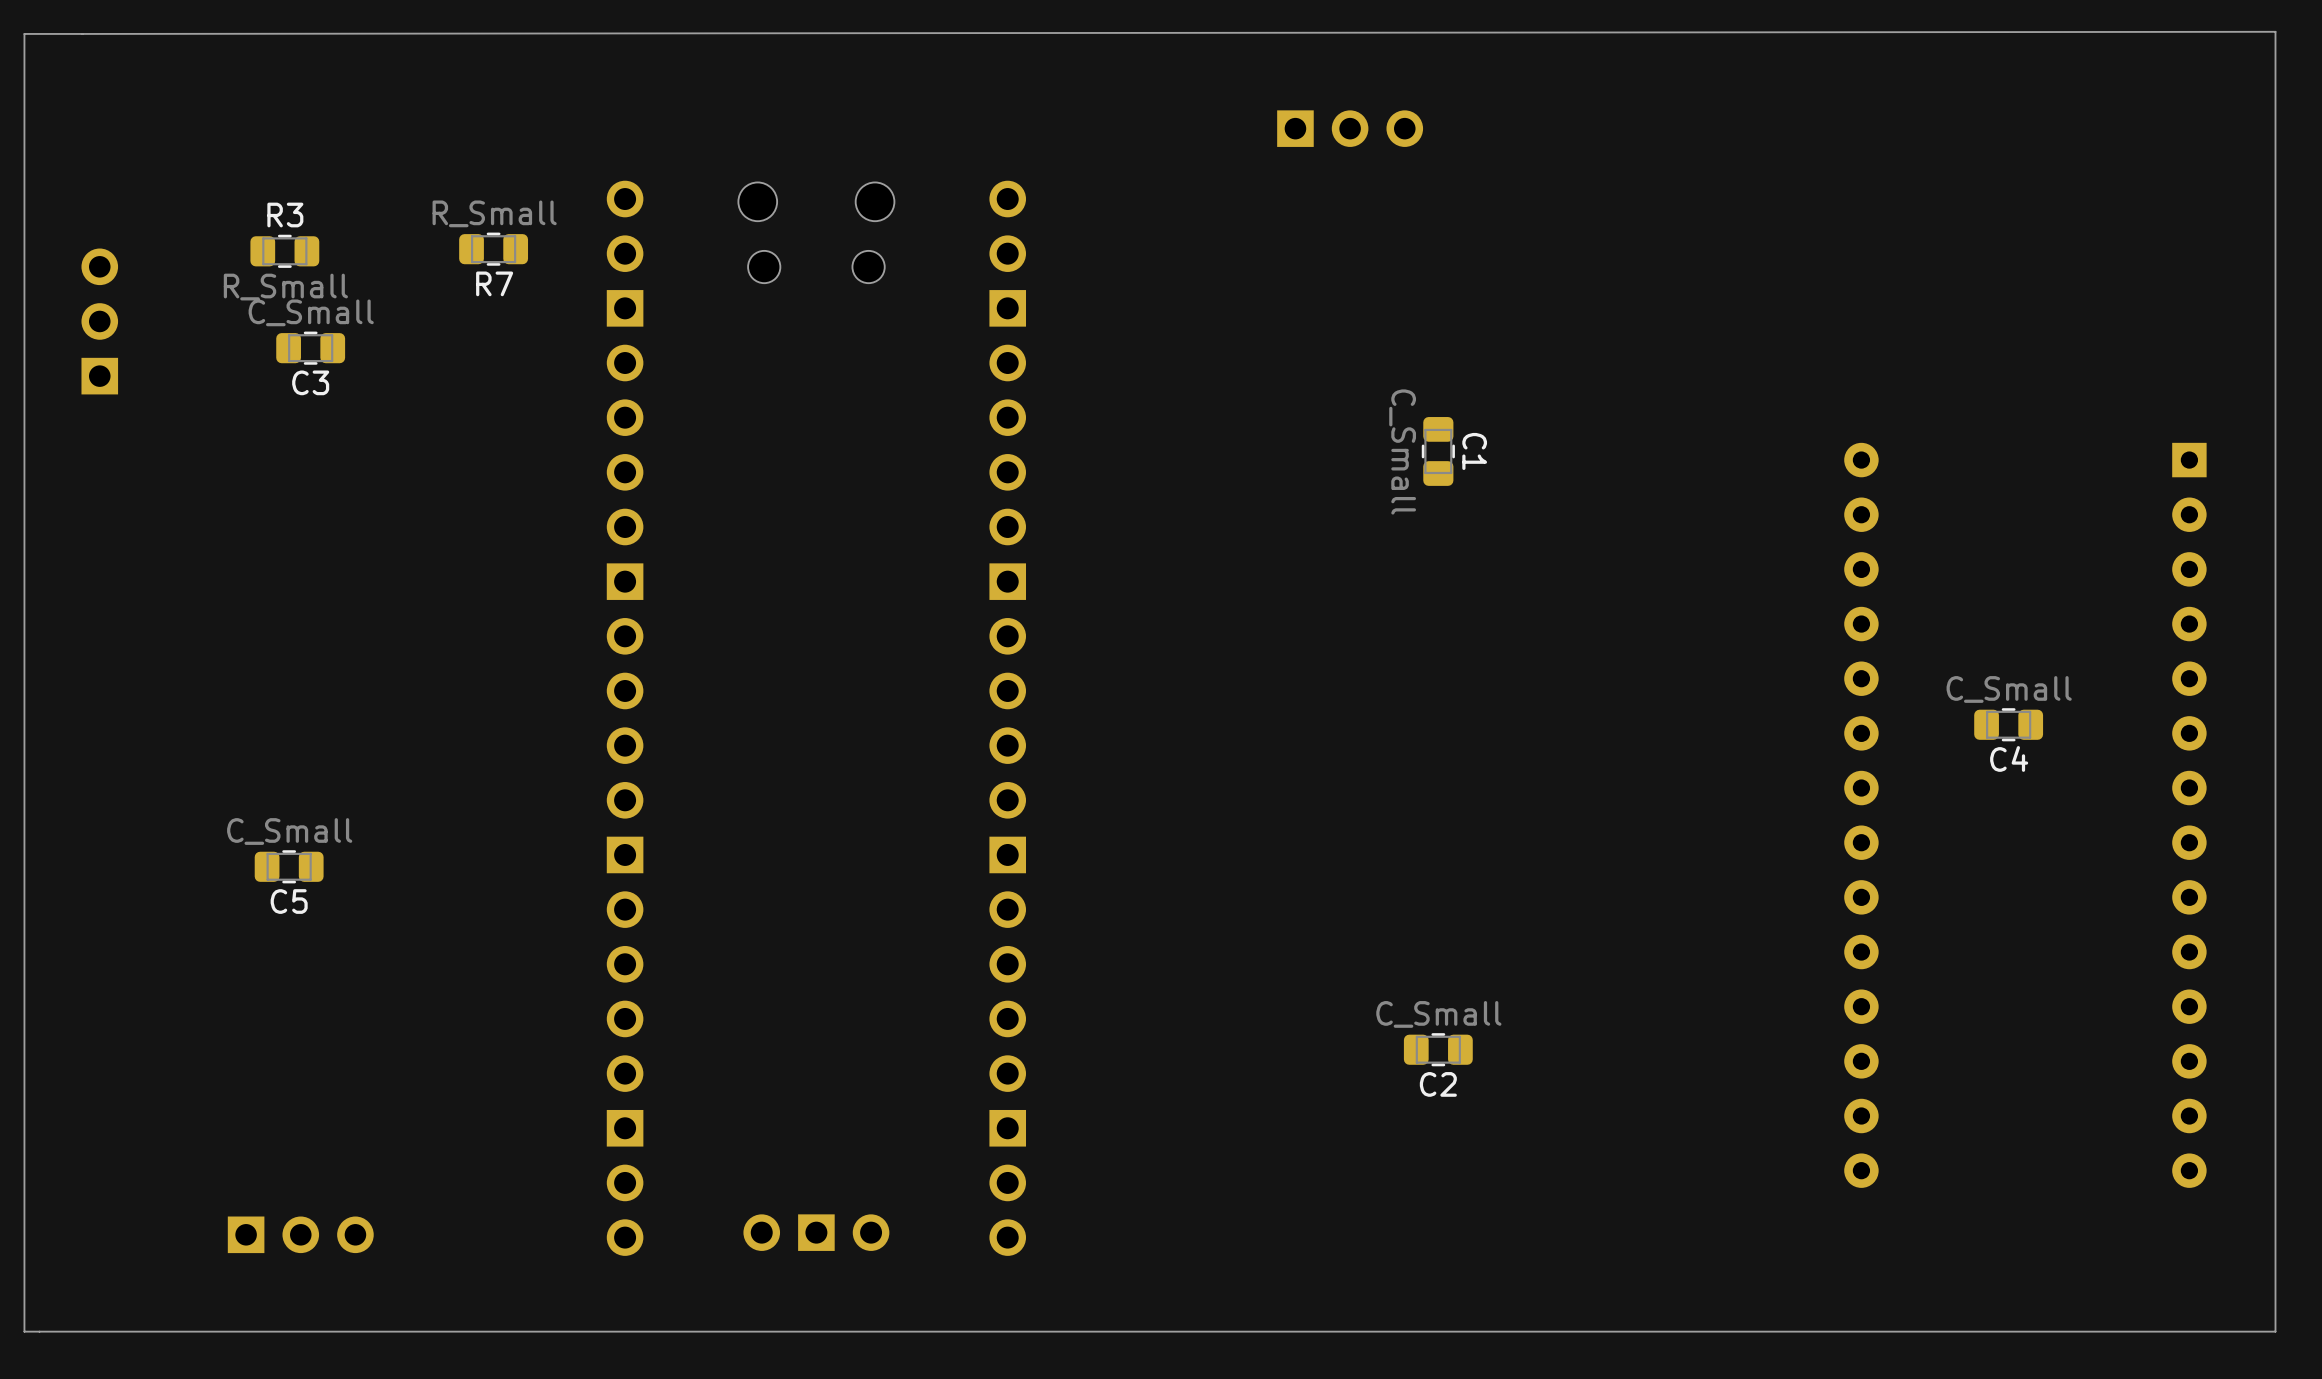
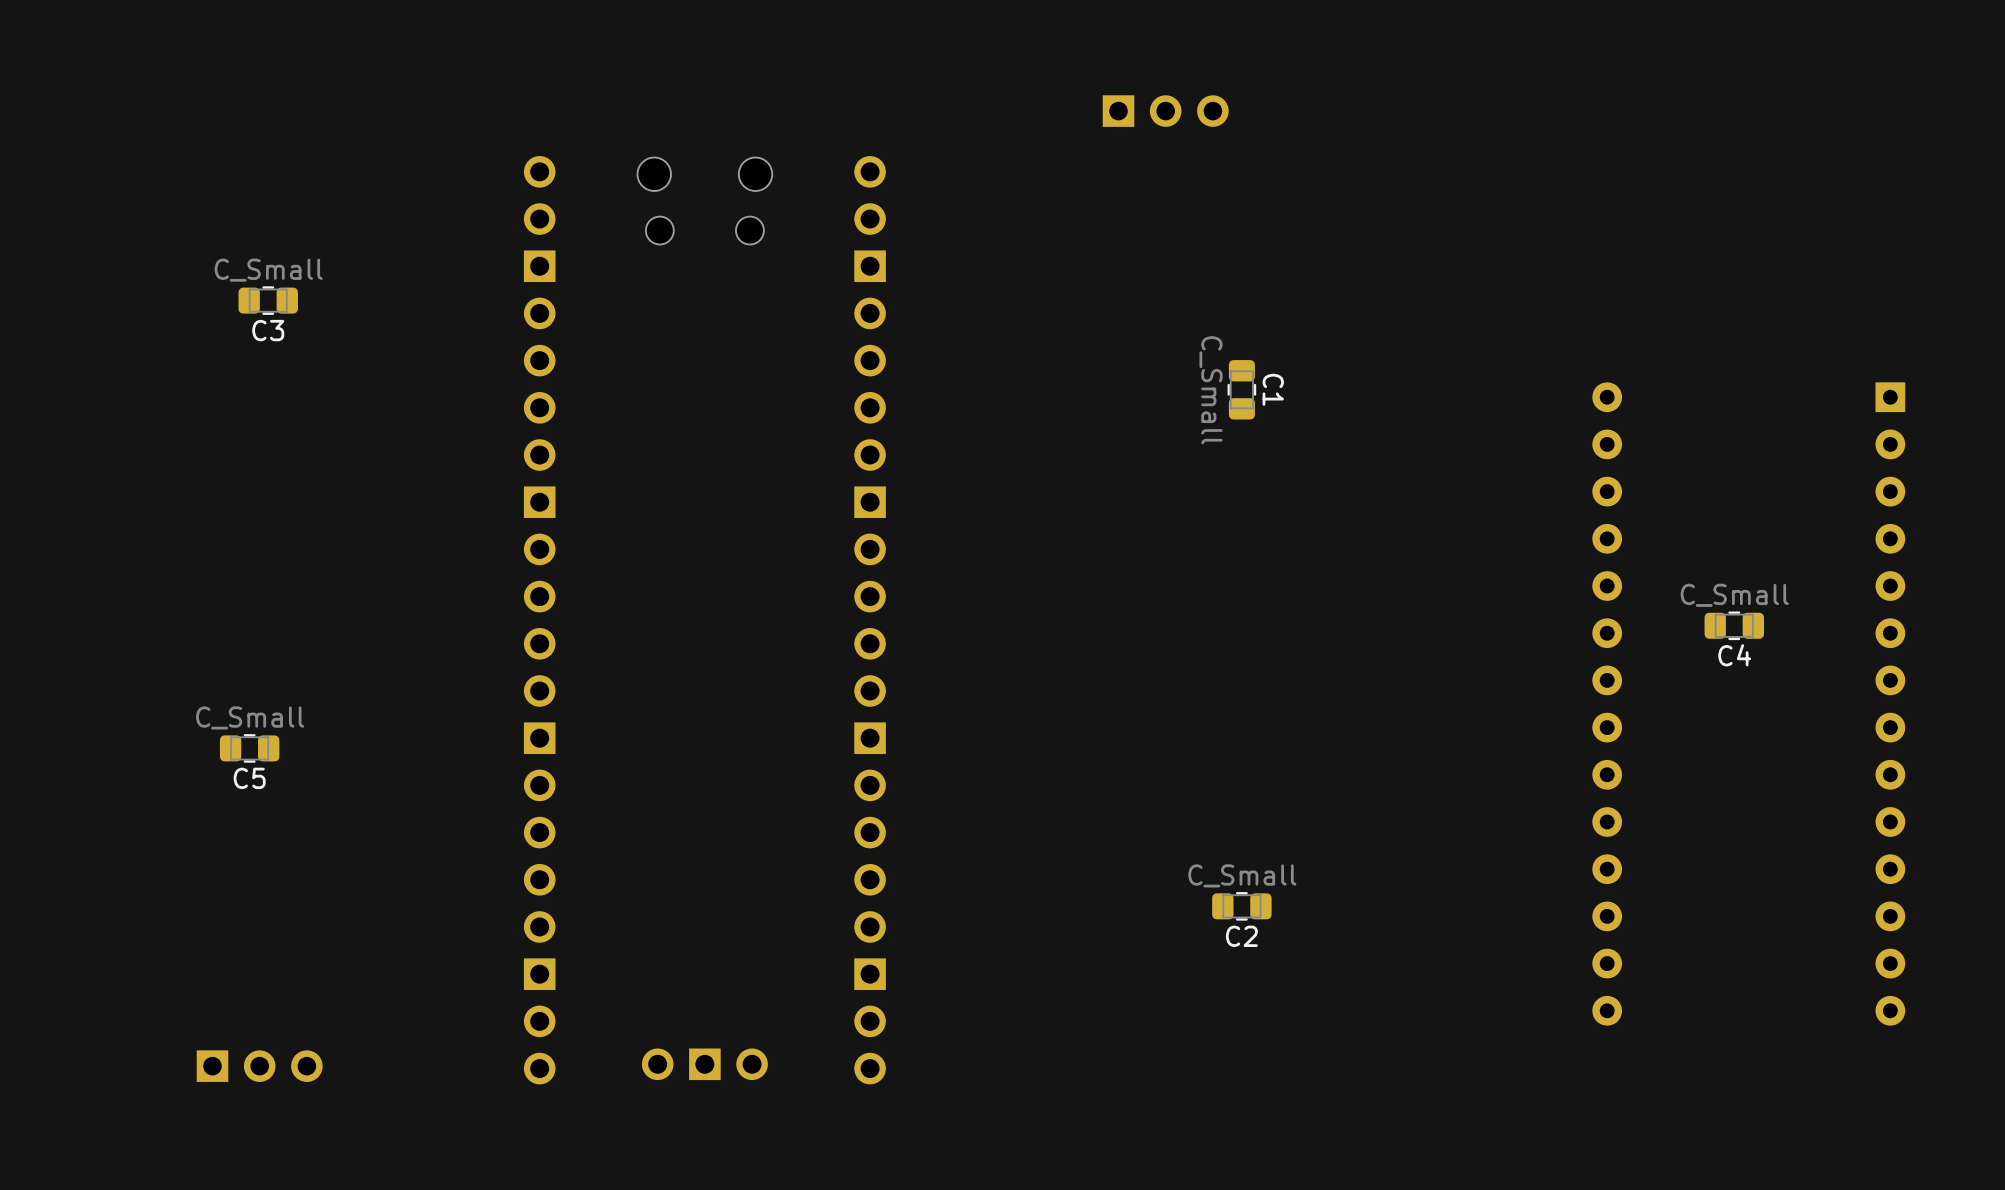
board edge: (2275, 31) (24, 33) (24, 1331) (2275, 1331) (2275, 31) -> none
R7: R_Small (493, 249) -> none
R3: R_Small (284, 251) -> none
part: (99, 321) -> none

